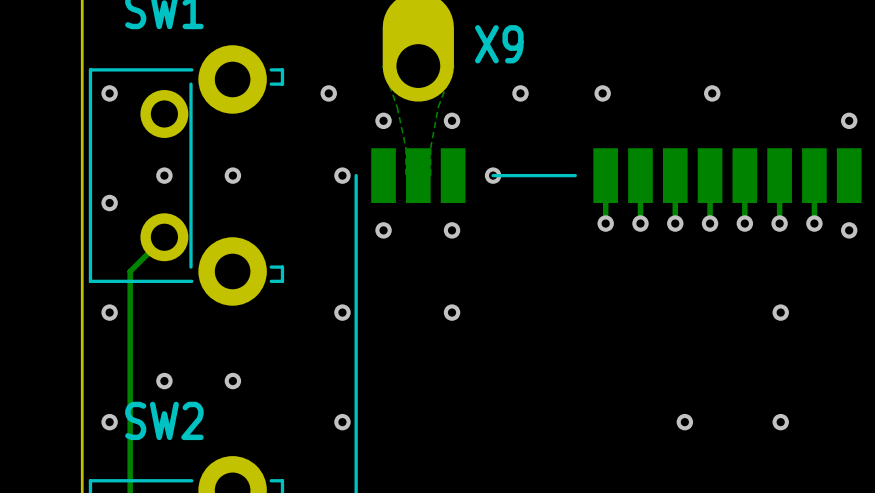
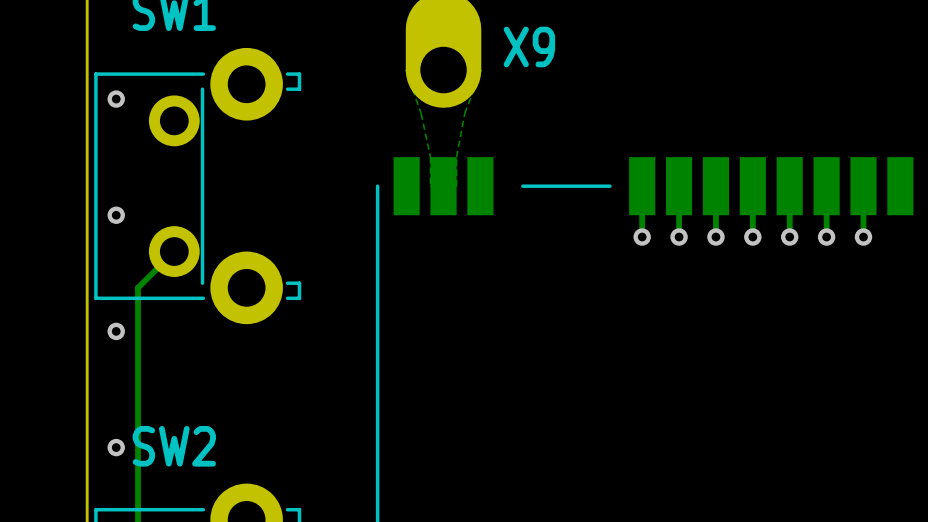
via: (328, 93) -> none
via: (520, 93) -> none
via: (602, 93) -> none
via: (712, 93) -> none
via: (383, 120) -> none
via: (452, 120) -> none
via: (849, 120) -> none
via: (164, 175) -> none
via: (232, 175) -> none
via: (342, 175) -> none
via: (493, 175) -> none
via: (383, 230) -> none
via: (452, 230) -> none
via: (849, 230) -> none
via: (342, 312) -> none
via: (452, 312) -> none
via: (780, 312) -> none
via: (164, 381) -> none
via: (232, 381) -> none
via: (342, 422) -> none
via: (684, 422) -> none
via: (780, 422) -> none

